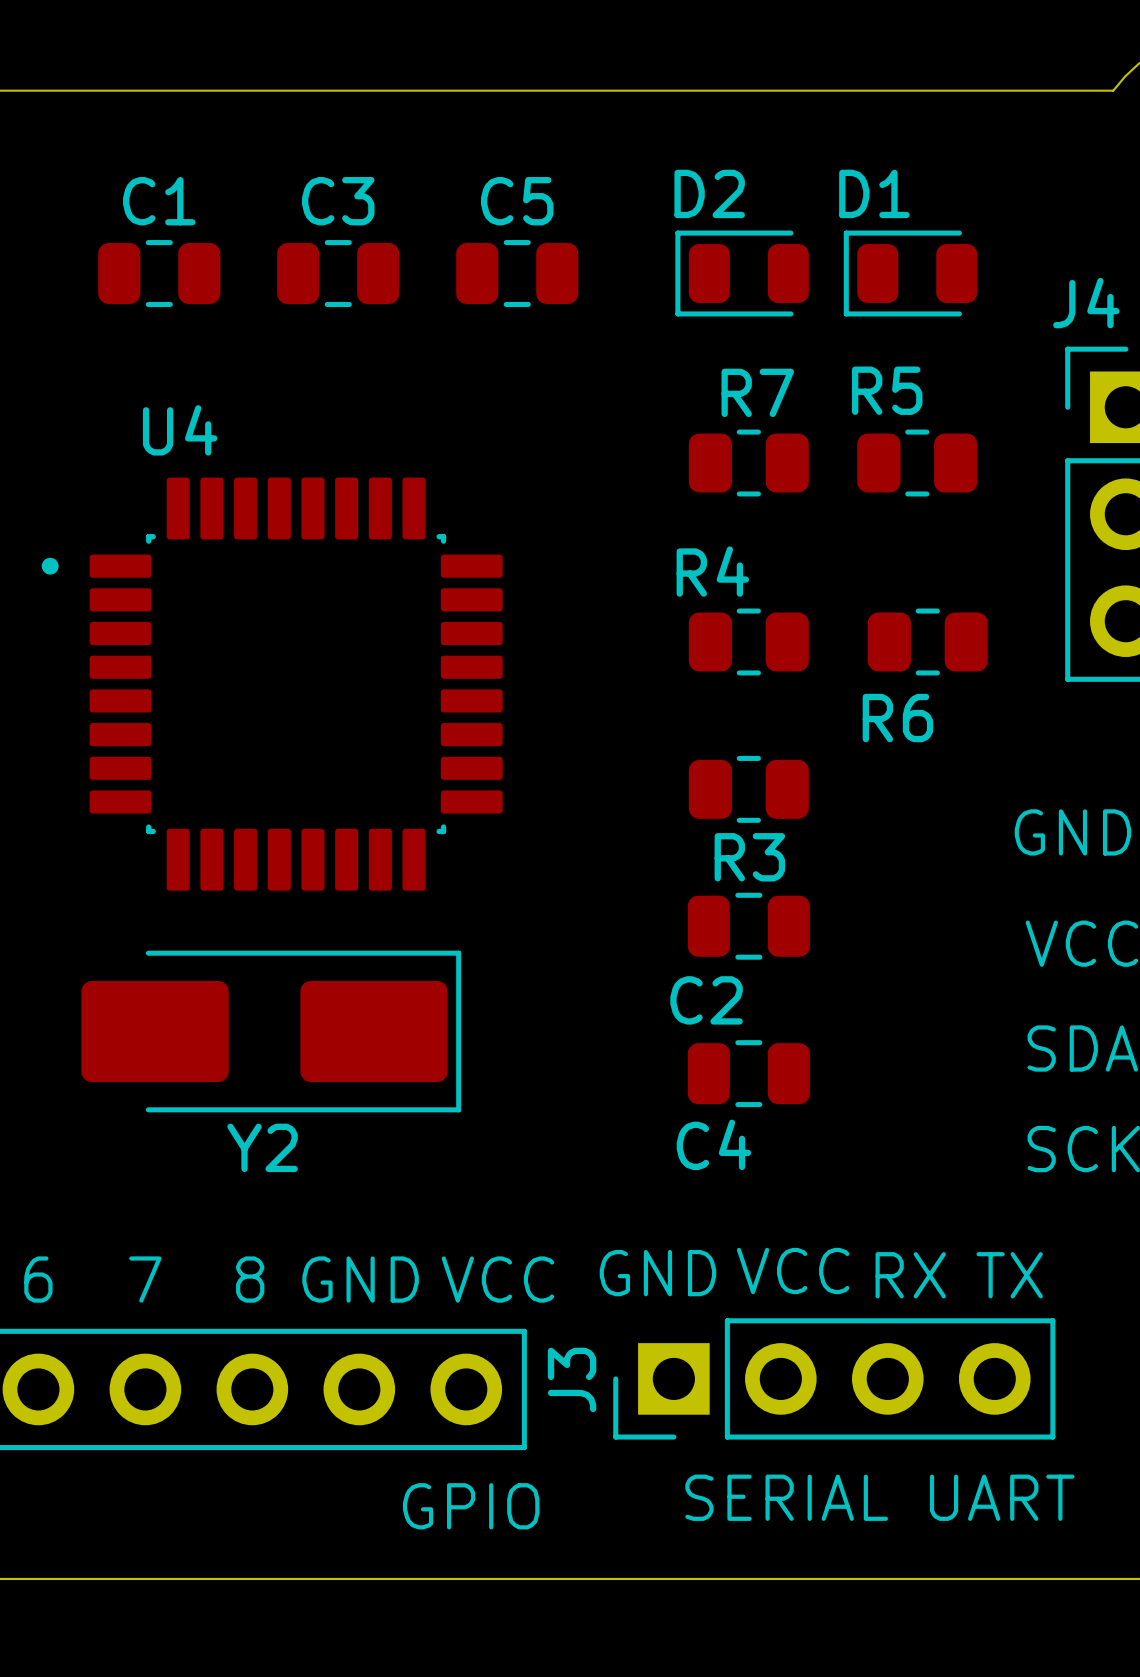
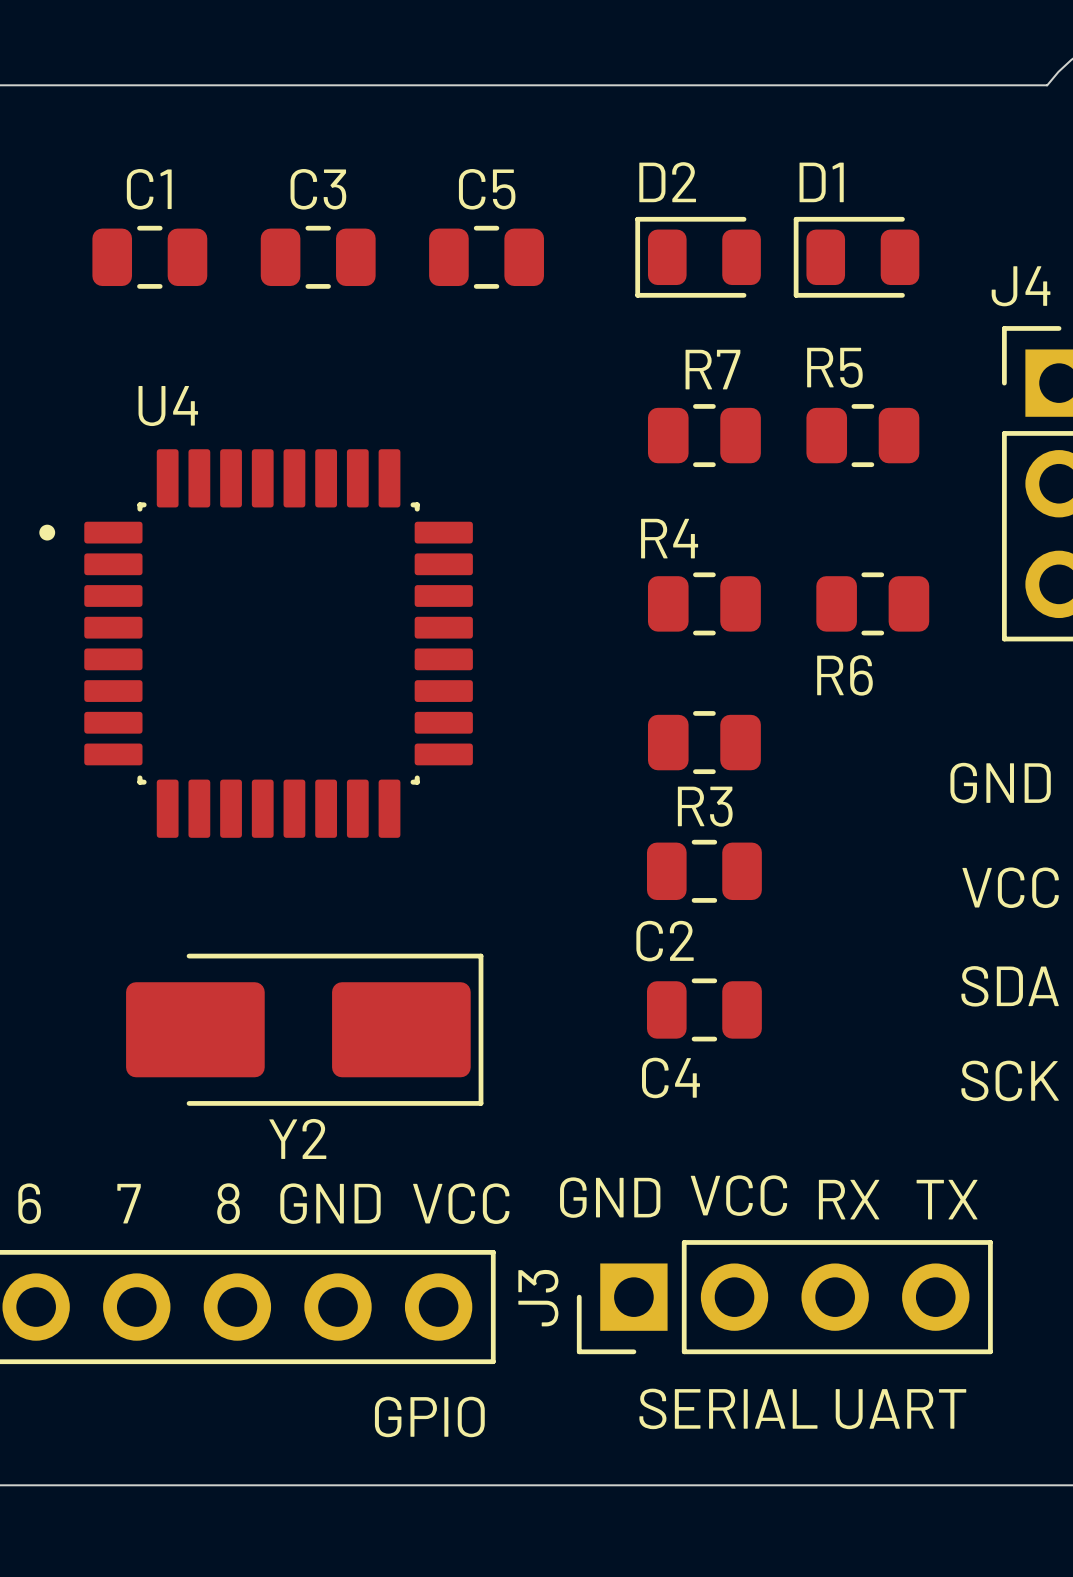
Y2 position: (271, 1031) -> (304, 1029)

